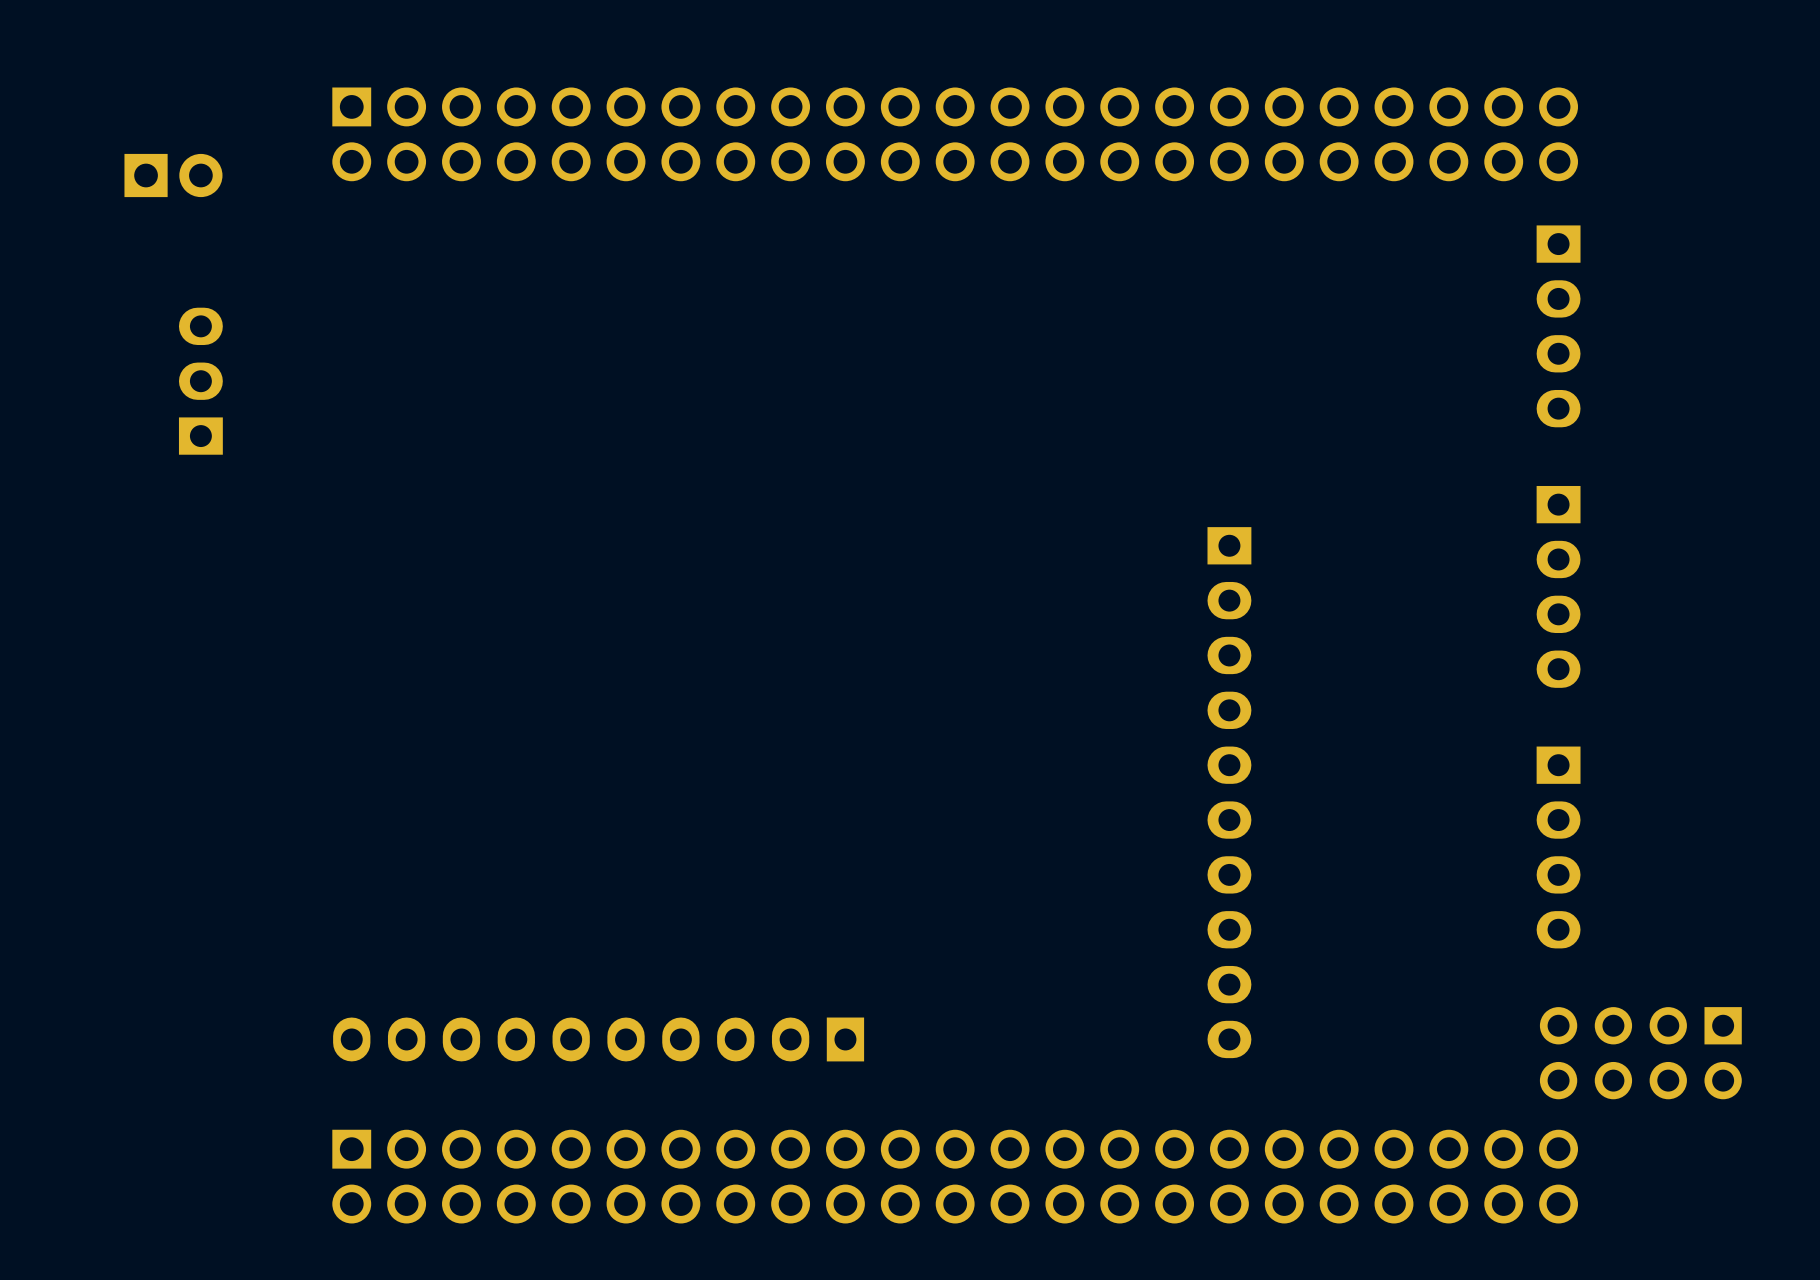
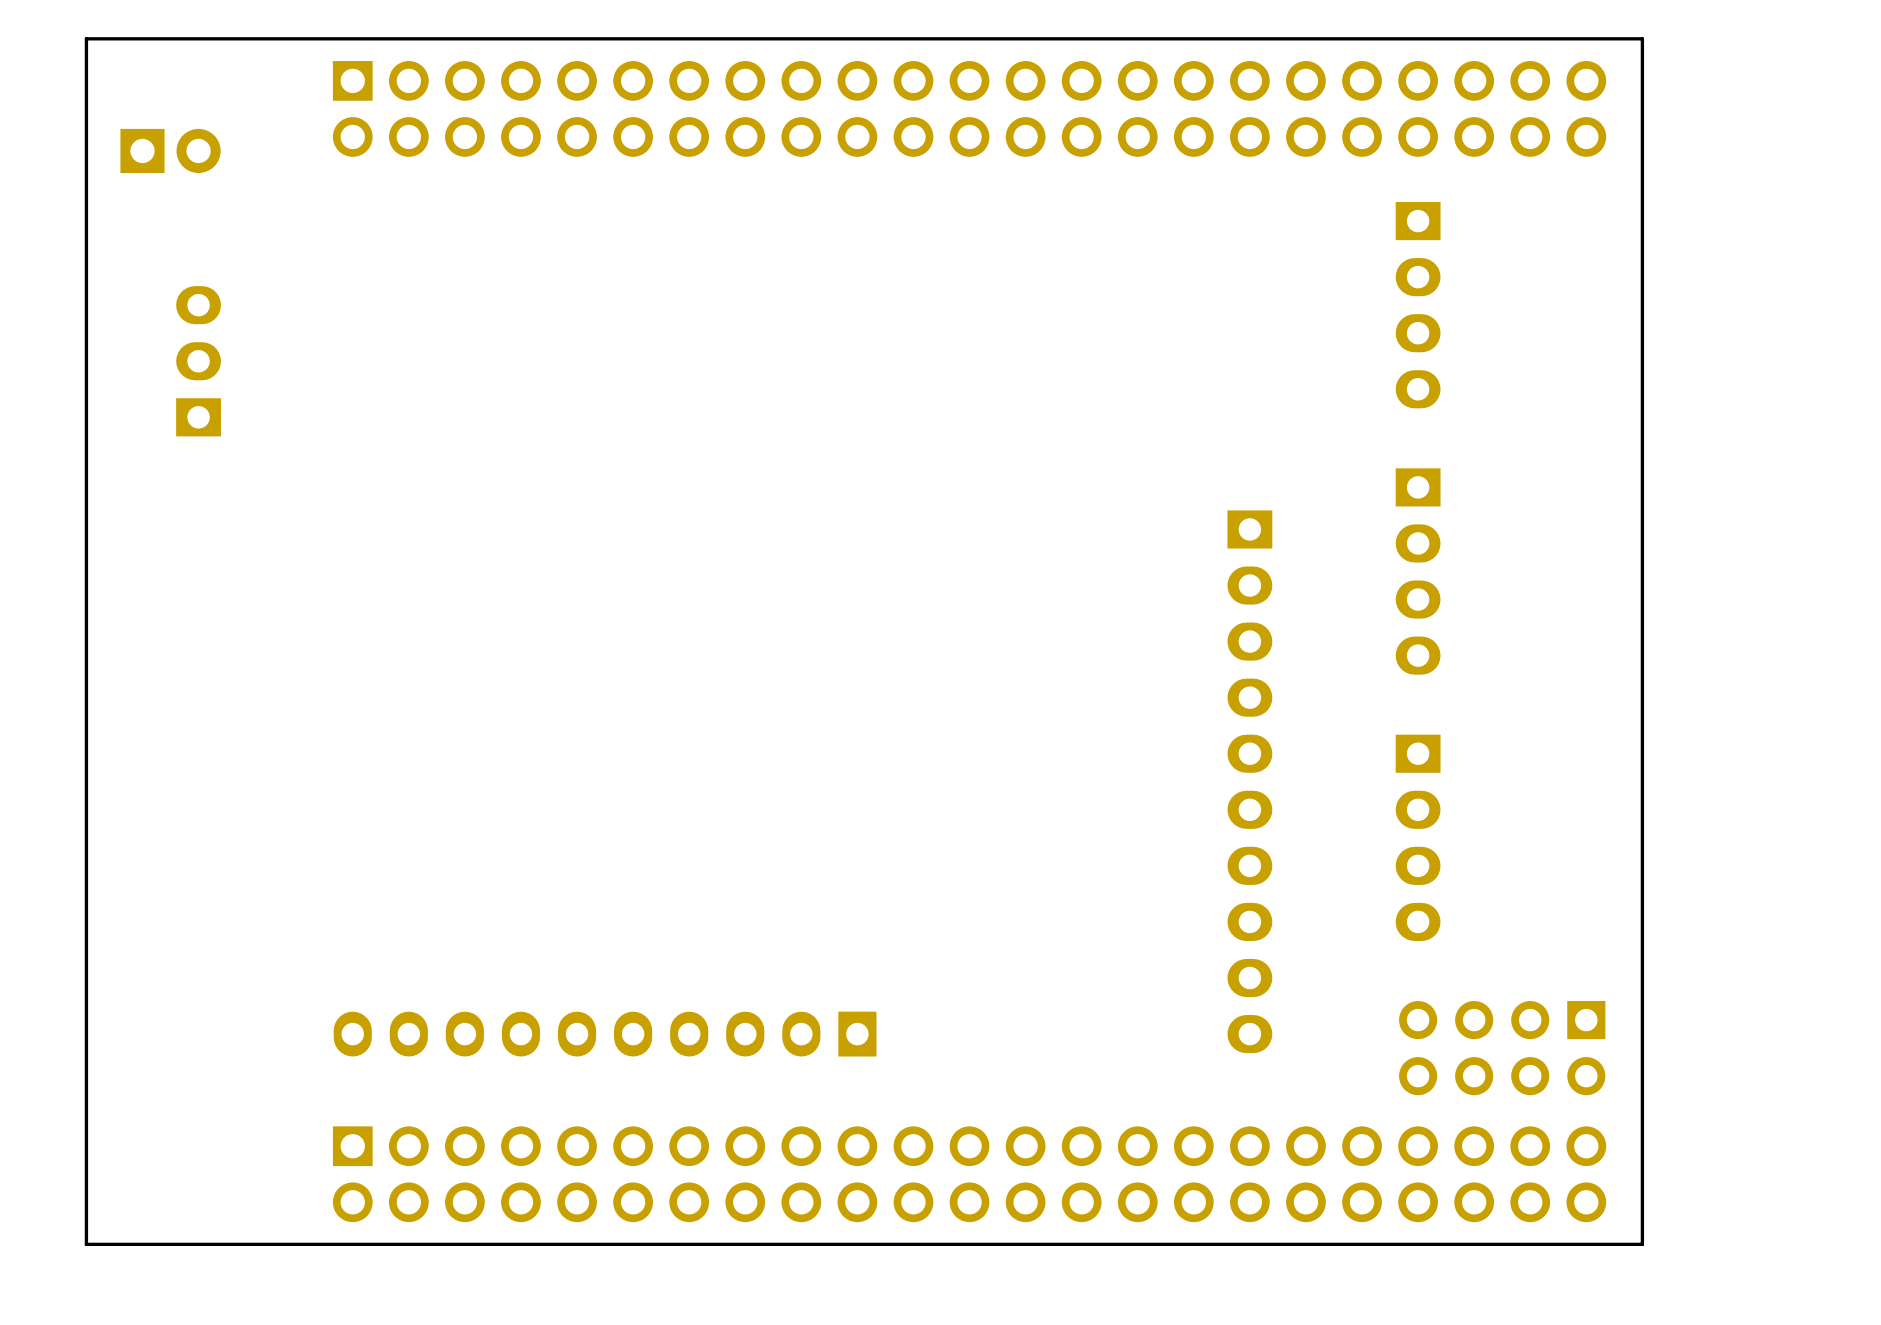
board edge: none -> (1642, 38) (86, 38) (86, 1244) (1642, 1244) (1642, 38)
part: none -> (1418, 305)
part: (1558, 326) -> none
part: none -> (1418, 571)
part: (1558, 586) -> none
part: none -> (1418, 837)
part: (1558, 847) -> none
part position: (1640, 1053) -> (1502, 1048)

